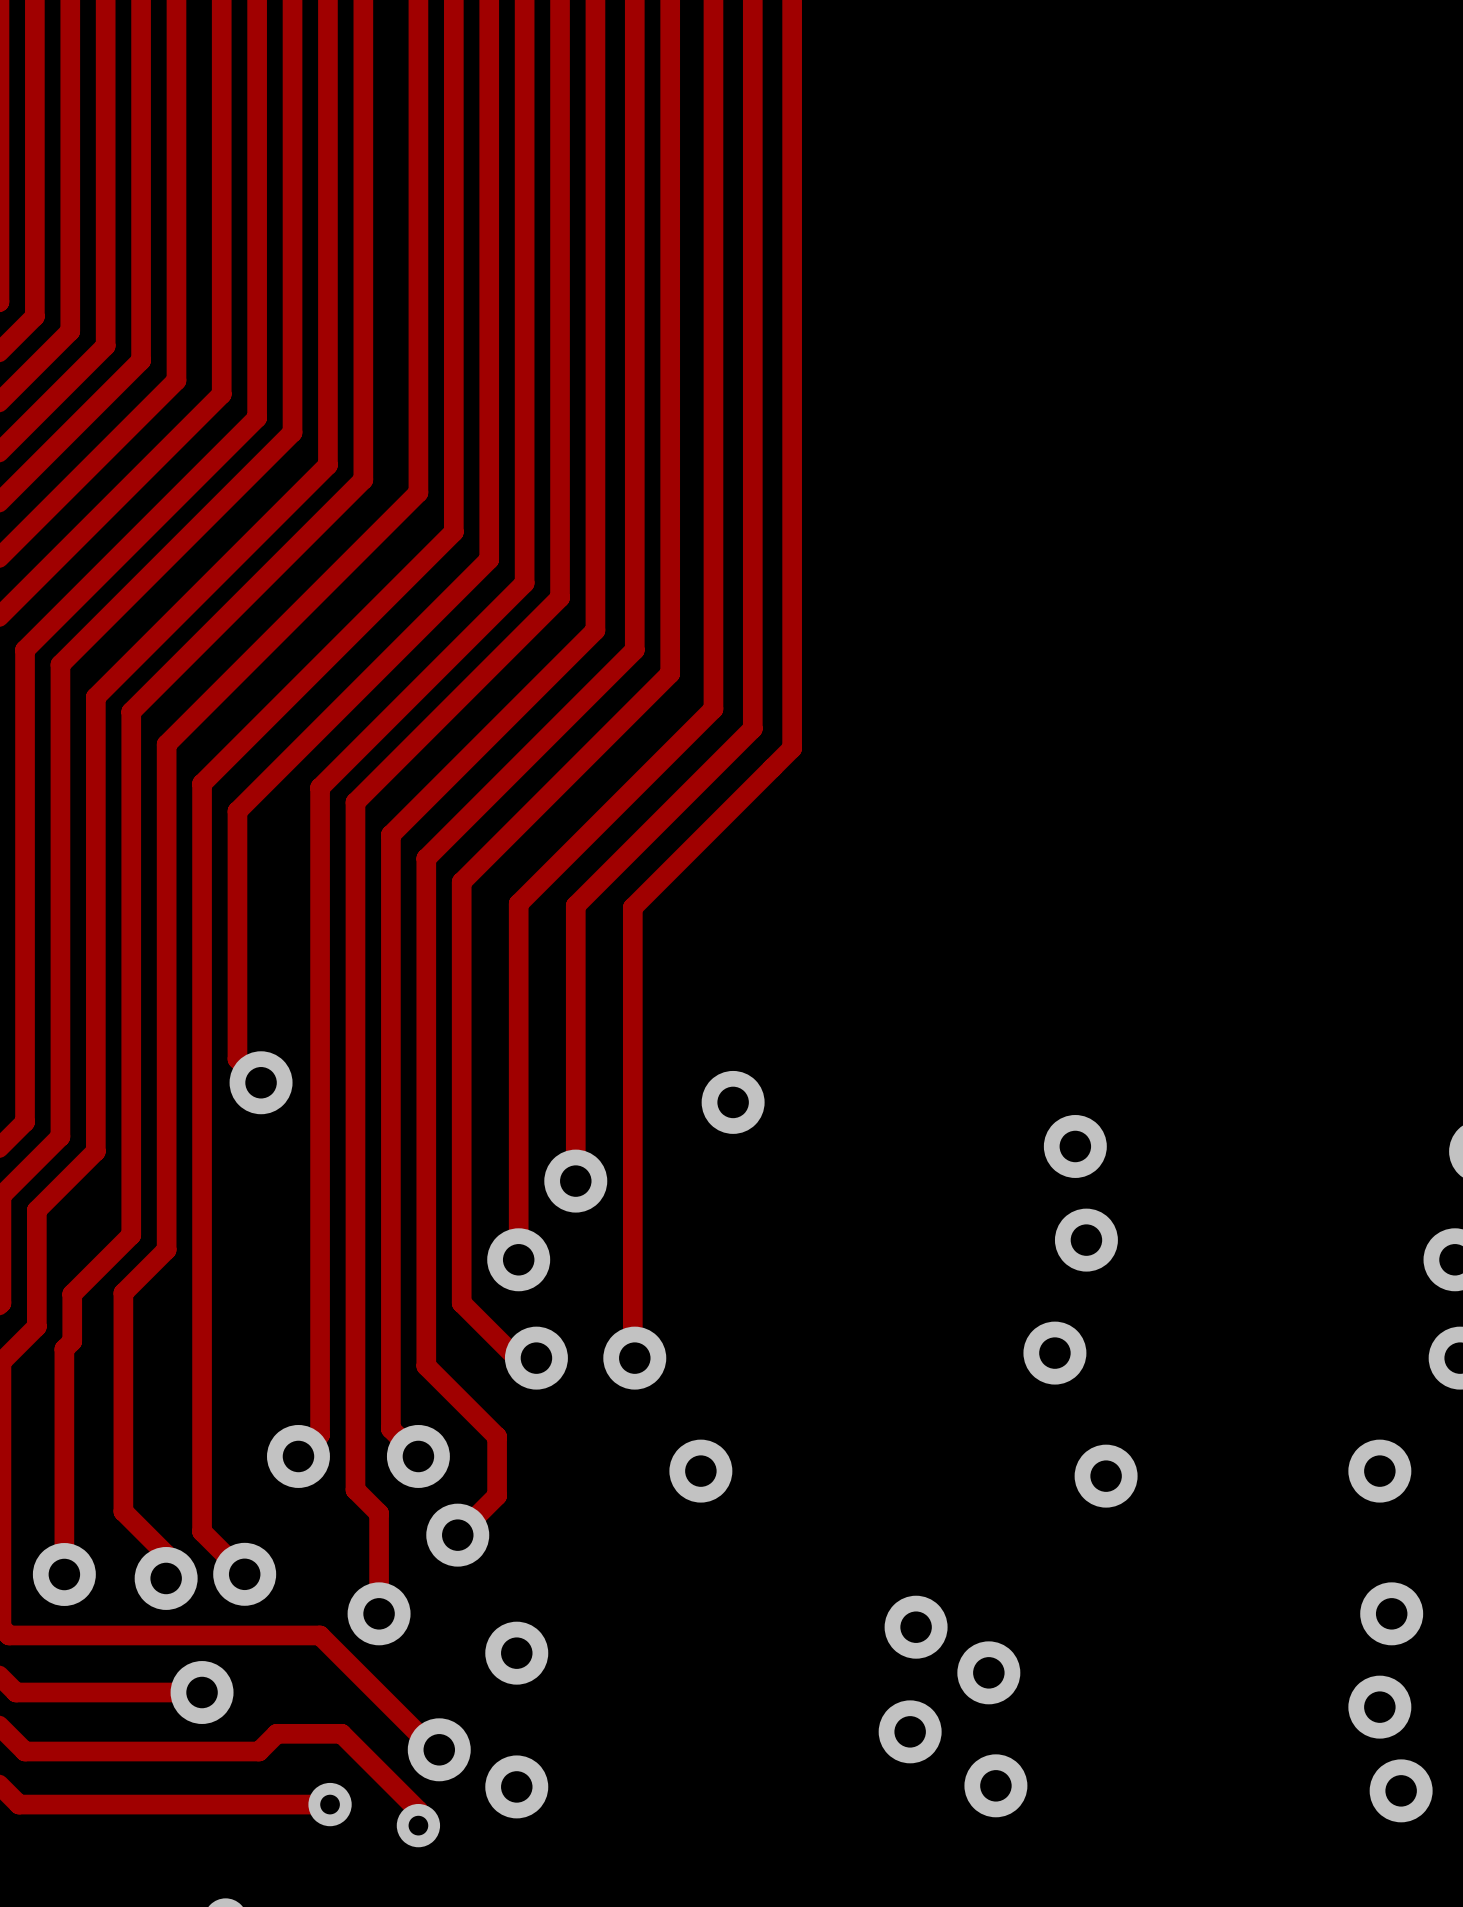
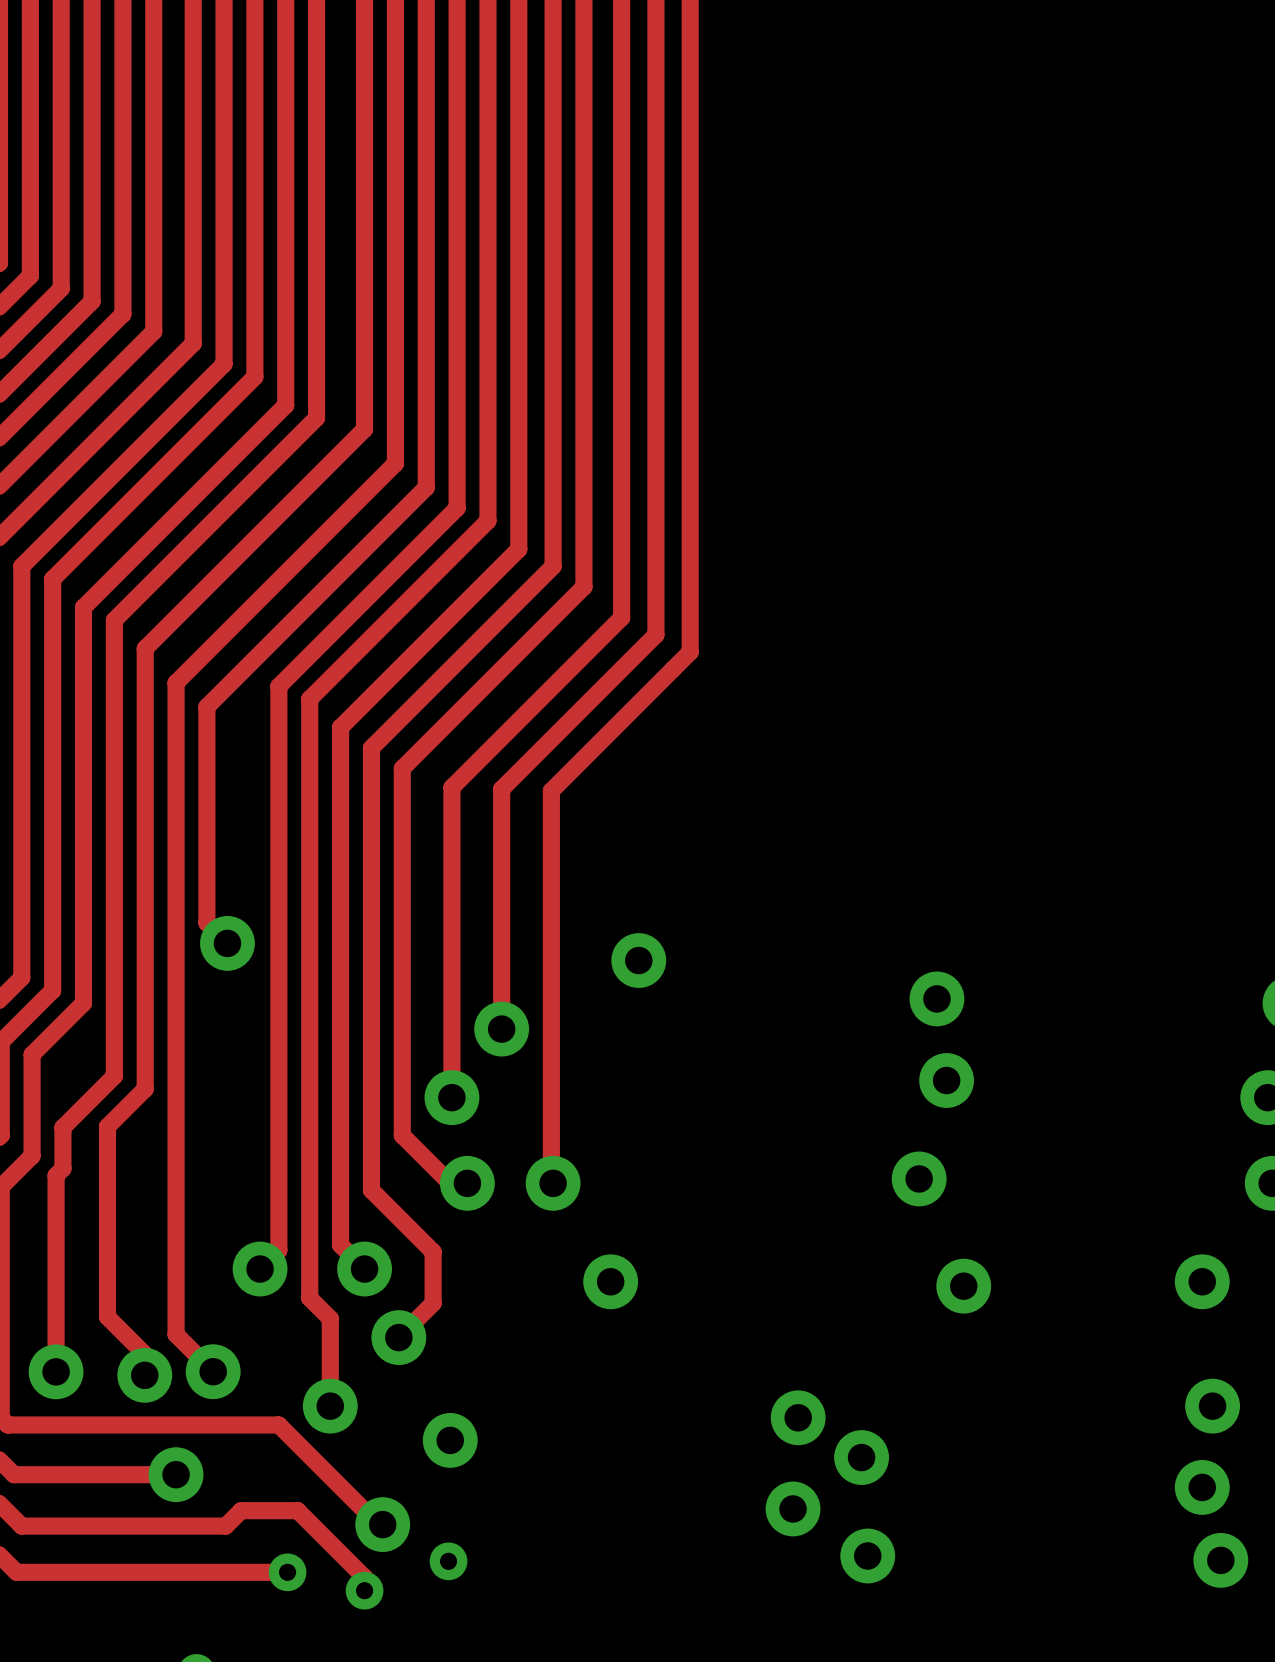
via size: [485, 1755, 549, 1819] -> [429, 1542, 468, 1581]

